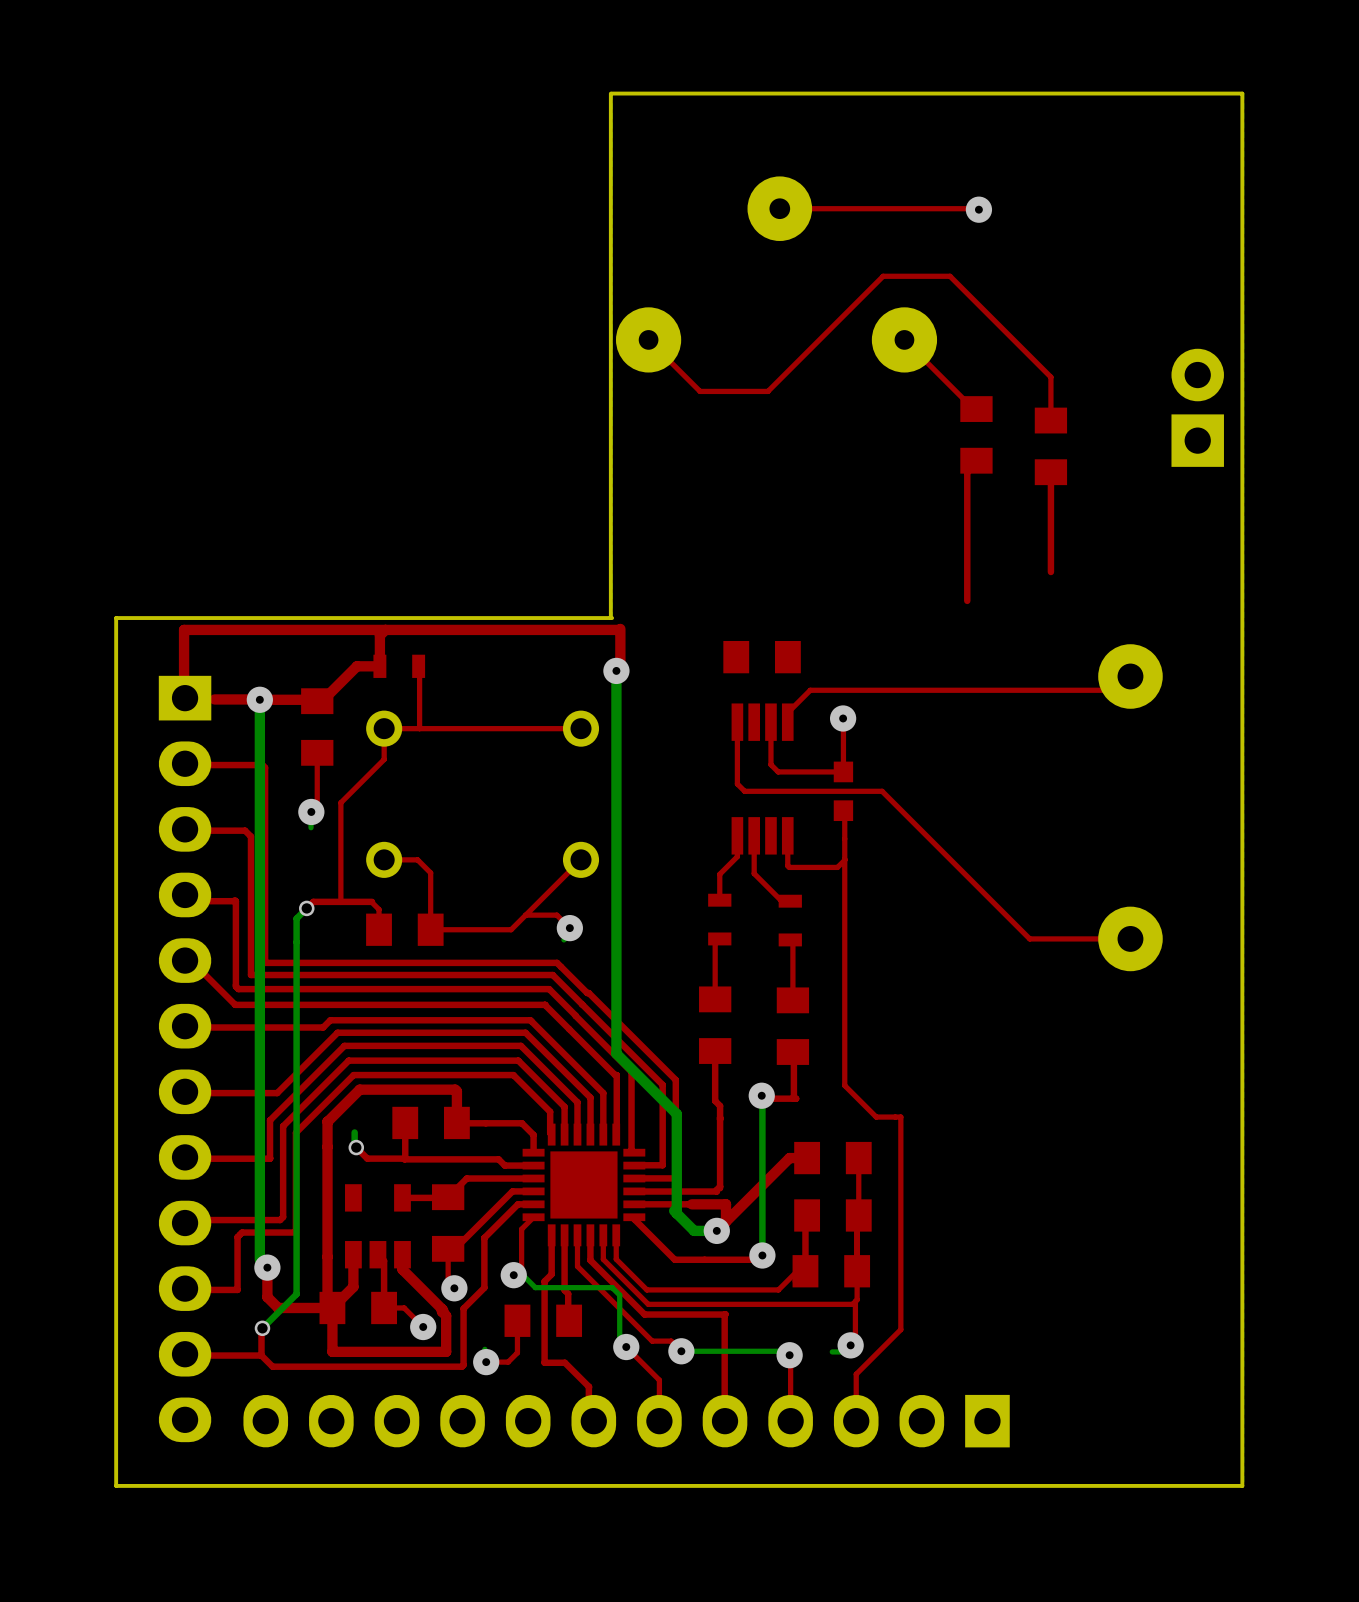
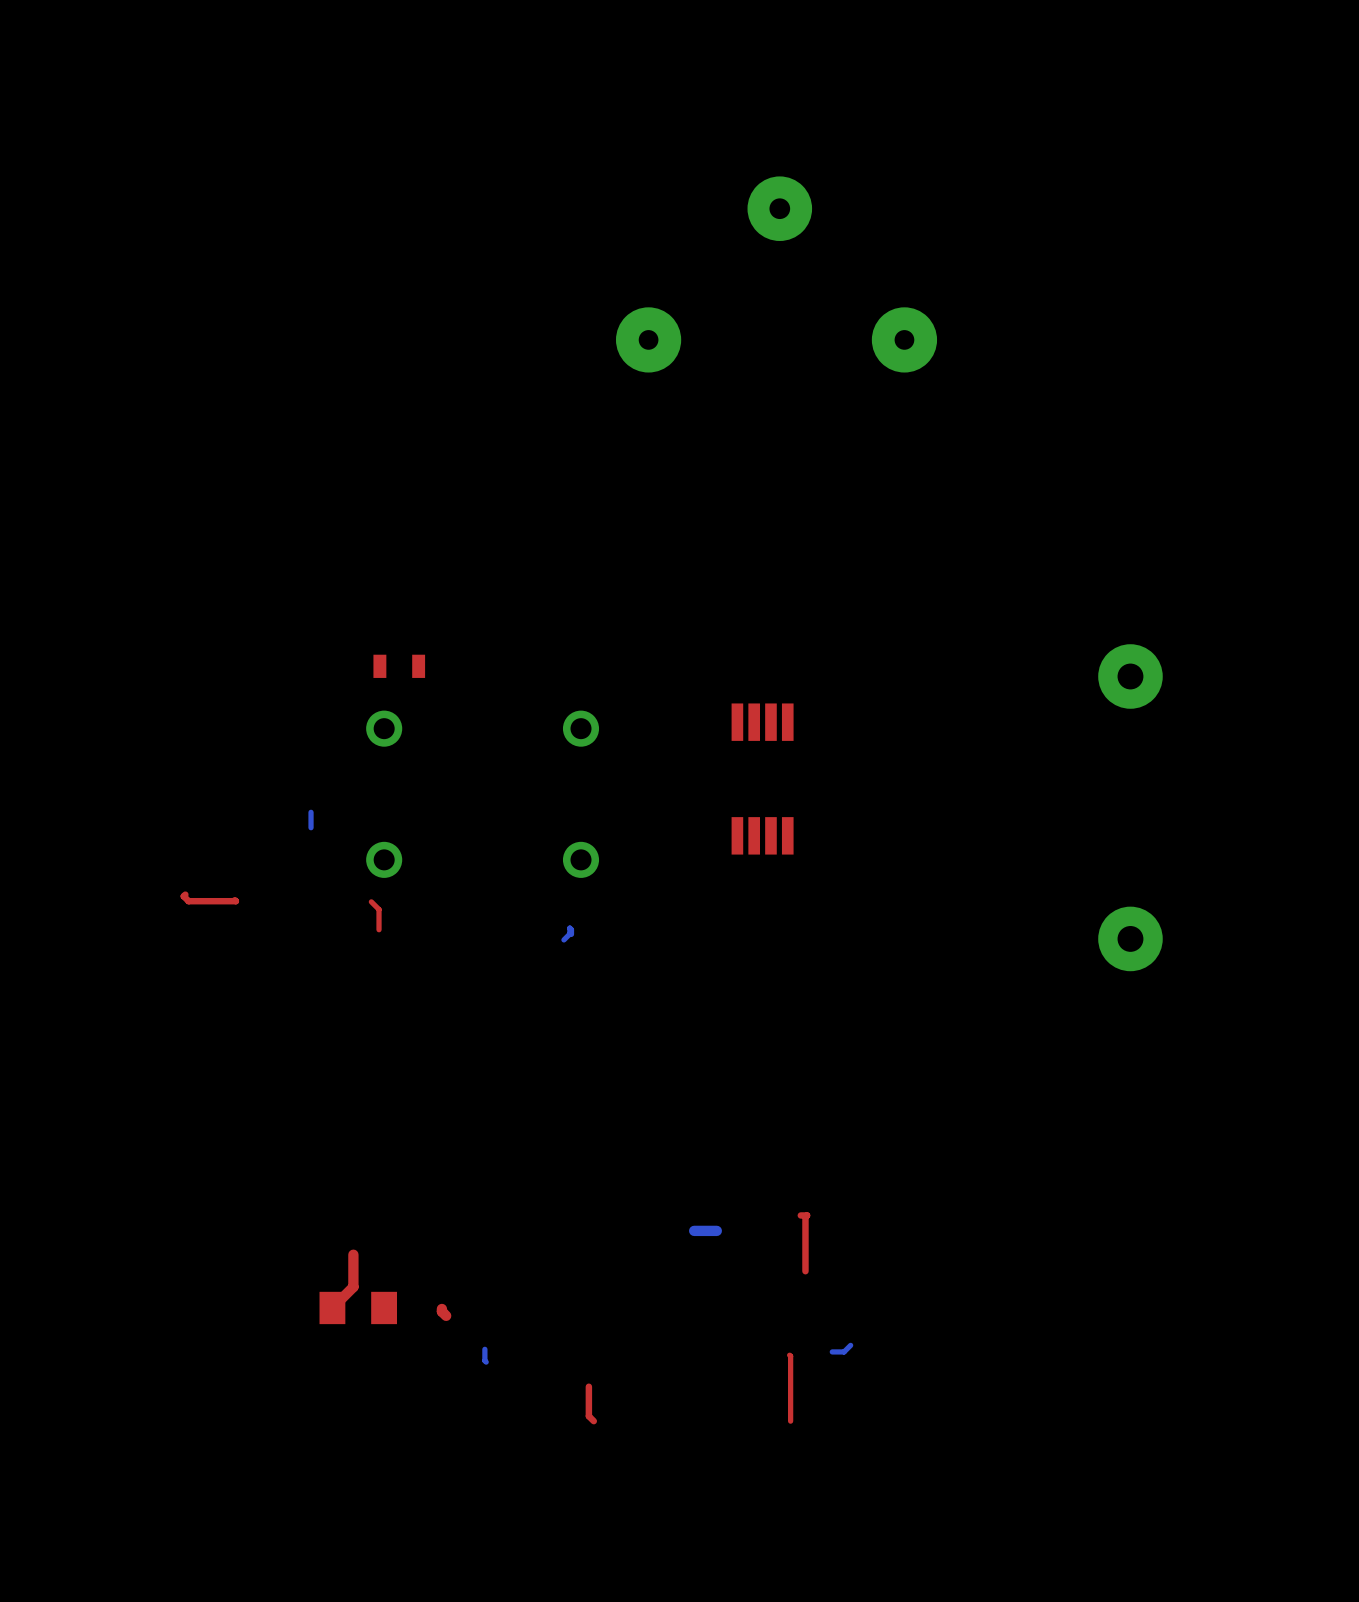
board edge: (610, 93) (610, 617) -> none
board edge: (611, 93) (1242, 93) (1242, 1485) (116, 1485) (116, 618) (612, 618) -> none
top track: (779, 208) (978, 209) -> none
via: (978, 209) -> none
top track: (648, 339) (700, 391) (767, 391) (883, 276) (950, 276) (1050, 377) (1050, 420) -> none
top track: (904, 339) (973, 409) (976, 409) -> none
part: (1197, 407) -> none
part: (976, 434) -> none
part: (1050, 446) -> none
top track: (968, 470) (967, 472) (967, 600) -> none
top track: (1046, 476) (1050, 472) (1050, 572) -> none
top track: (385, 629) (379, 635) (379, 666) (356, 666) (322, 701) (259, 699) -> none
part: (762, 657) -> none
top track: (418, 666) (419, 728) -> none
bottom track: (616, 670) (616, 1053) (676, 1114) (676, 1213) -> none
top track: (616, 670) (620, 666) (620, 628) (184, 629) (184, 697) (186, 699) (214, 699) -> none
via: (616, 670) -> none
top track: (1130, 676) (1116, 690) (810, 690) (787, 712) (787, 722) -> none
bottom track: (259, 699) (259, 1260) (267, 1267) -> none
top track: (259, 699) (214, 699) -> none
via: (259, 699) -> none
top track: (843, 718) (843, 771) (778, 771) (770, 764) (772, 720) -> none
via: (843, 718) -> none
top track: (737, 722) (737, 784) (744, 791) (882, 791) (1029, 938) (1130, 938) -> none
part: (317, 727) -> none
top track: (581, 728) (384, 728) (384, 759) (340, 802) (340, 901) -> none
top track: (317, 752) (317, 806) (311, 811) -> none
top track: (183, 765) (262, 765) (265, 767) (265, 962) (557, 962) (675, 1079) (675, 1176) (677, 1178) (634, 1178) -> none
part: (843, 791) -> none
top track: (843, 810) (844, 1085) (876, 1117) (900, 1117) (900, 1329) (856, 1374) (856, 1421) -> none
via: (311, 811) -> none
top track: (737, 835) (737, 856) (719, 874) (719, 900) -> none
top track: (754, 835) (754, 873) (780, 900) (794, 900) -> none
top track: (787, 835) (789, 867) (837, 867) (844, 860) -> none
top track: (193, 840) (183, 830) (245, 830) (250, 836) (250, 975) (552, 975) (662, 1084) (662, 1165) (634, 1165) -> none
top track: (581, 859) (511, 929) (430, 929) (430, 872) (417, 859) (384, 859) -> none
top track: (235, 901) (235, 986) (238, 989) (549, 989) (575, 1015) -> none
top track: (372, 901) (313, 901) (306, 908) -> none
bottom track: (306, 908) (296, 918) (296, 1294) (262, 1328) -> none
via: (306, 908) -> none
top track: (525, 915) (556, 915) (569, 928) -> none
part: (719, 919) -> none
part: (790, 920) -> none
via: (569, 928) -> none
part: (404, 929) -> none
top track: (719, 938) (715, 943) (715, 999) (724, 999) -> none
top track: (790, 939) (792, 942) (792, 1000) -> none
top track: (187, 965) (183, 961) (192, 961) (235, 1004) (545, 1004) -> none
top track: (544, 1004) (616, 1075) (616, 1134) -> none
top track: (575, 1016) (631, 1071) (631, 1149) (634, 1152) -> none
part: (715, 1025) -> none
part: (792, 1026) -> none
top track: (183, 1027) (323, 1027) (330, 1020) (530, 1020) (603, 1093) (603, 1134) -> none
top track: (715, 1051) (715, 1100) (720, 1105) (720, 1188) -> none
top track: (792, 1052) (793, 1098) -> none
part: (185, 1058) -> none
bottom track: (761, 1095) (762, 1255) -> none
top track: (761, 1095) (764, 1098) (796, 1098) -> none
via: (761, 1095) -> none
top track: (198, 1107) (183, 1093) (277, 1093) (337, 1032) (525, 1032) (590, 1097) (590, 1134) -> none
top track: (456, 1118) (456, 1122) (456, 1091) (455, 1089) (359, 1089) (327, 1121) -> none
top track: (327, 1121) (327, 1310) -> none
top track: (405, 1122) (405, 1158) -> none
part: (431, 1122) -> none
top track: (457, 1123) (521, 1123) (533, 1134) (533, 1152) -> none
bottom track: (354, 1132) (356, 1147) -> none
top track: (551, 1134) (550, 1111) (513, 1075) (353, 1075) (295, 1132) (295, 1232) (242, 1232) (237, 1237) (237, 1289) (183, 1289) (187, 1286) -> none
top track: (564, 1134) (564, 1106) (518, 1060) (348, 1060) (283, 1126) (283, 1217) (280, 1220) (188, 1220) (183, 1224) (185, 1225) -> none
top track: (577, 1134) (577, 1102) (520, 1045) (344, 1045) (270, 1120) (270, 1158) (183, 1158) -> none
top track: (356, 1147) (367, 1158) (405, 1158) -> none
via: (356, 1147) -> none
top track: (405, 1158) (498, 1159) (504, 1165) (533, 1165) -> none
top track: (807, 1158) (789, 1158) (716, 1230) (726, 1221) (726, 1204) (634, 1204) -> none
part: (832, 1158) -> none
top track: (858, 1158) (857, 1299) (852, 1304) (648, 1304) (603, 1259) (603, 1235) -> none
top track: (533, 1178) (466, 1178) (447, 1197) (402, 1197) -> none
part: (583, 1184) -> none
top track: (720, 1186) (716, 1191) (634, 1191) -> none
top track: (533, 1191) (512, 1191) (455, 1248) (448, 1248) (448, 1282) (454, 1288) -> none
top track: (533, 1204) (518, 1204) (484, 1238) -> none
bottom track: (674, 1210) (694, 1230) (674, 1210) -> none
part: (832, 1215) -> none
top track: (530, 1217) (533, 1217) (521, 1229) (521, 1267) (513, 1275) -> none
top track: (634, 1217) (674, 1259) (758, 1259) (762, 1255) -> none
part: (448, 1223) -> none
part: (377, 1226) -> none
via: (716, 1230) -> none
top track: (551, 1235) (551, 1274) (544, 1281) (544, 1362) (564, 1362) (589, 1387) -> none
top track: (564, 1235) (564, 1290) (568, 1293) (569, 1320) -> none
top track: (577, 1235) (577, 1266) (652, 1341) (671, 1341) (681, 1351) -> none
top track: (590, 1235) (590, 1260) (644, 1314) (725, 1314) -> none
top track: (616, 1235) (616, 1259) (646, 1289) (778, 1289) (797, 1271) (805, 1271) (795, 1281) -> none
top track: (484, 1237) (484, 1287) (463, 1308) (463, 1365) (461, 1366) (272, 1366) (261, 1355) -> none
top track: (377, 1254) (384, 1260) (384, 1307) (404, 1307) (423, 1327) -> none
top track: (402, 1254) (402, 1269) (443, 1310) (402, 1271) (402, 1255) (402, 1254) -> none
via: (762, 1255) -> none
top track: (267, 1267) (267, 1297) (278, 1307) (332, 1307) -> none
via: (267, 1267) -> none
part: (831, 1271) -> none
bottom track: (513, 1275) (522, 1275) (535, 1287) (612, 1287) (619, 1295) (619, 1340) (626, 1347) -> none
via: (513, 1275) -> none
via: (454, 1288) -> none
top track: (855, 1301) (855, 1340) (850, 1345) -> none
top track: (332, 1307) (332, 1351) (446, 1351) (446, 1312) (443, 1310) -> none
top track: (724, 1314) (724, 1420) -> none
top track: (517, 1320) (517, 1352) (508, 1362) (486, 1362) -> none
part: (543, 1320) -> none
via: (423, 1327) -> none
top track: (262, 1328) (261, 1355) -> none
via: (262, 1328) -> none
via: (850, 1345) -> none
top track: (626, 1347) (659, 1380) (659, 1421) (657, 1419) -> none
via: (626, 1347) -> none
bottom track: (681, 1351) (785, 1351) (789, 1355) -> none
via: (681, 1351) -> none
top track: (187, 1352) (183, 1355) (261, 1355) -> none
via: (789, 1355) -> none
via: (486, 1362) -> none
part: (626, 1421) -> none

